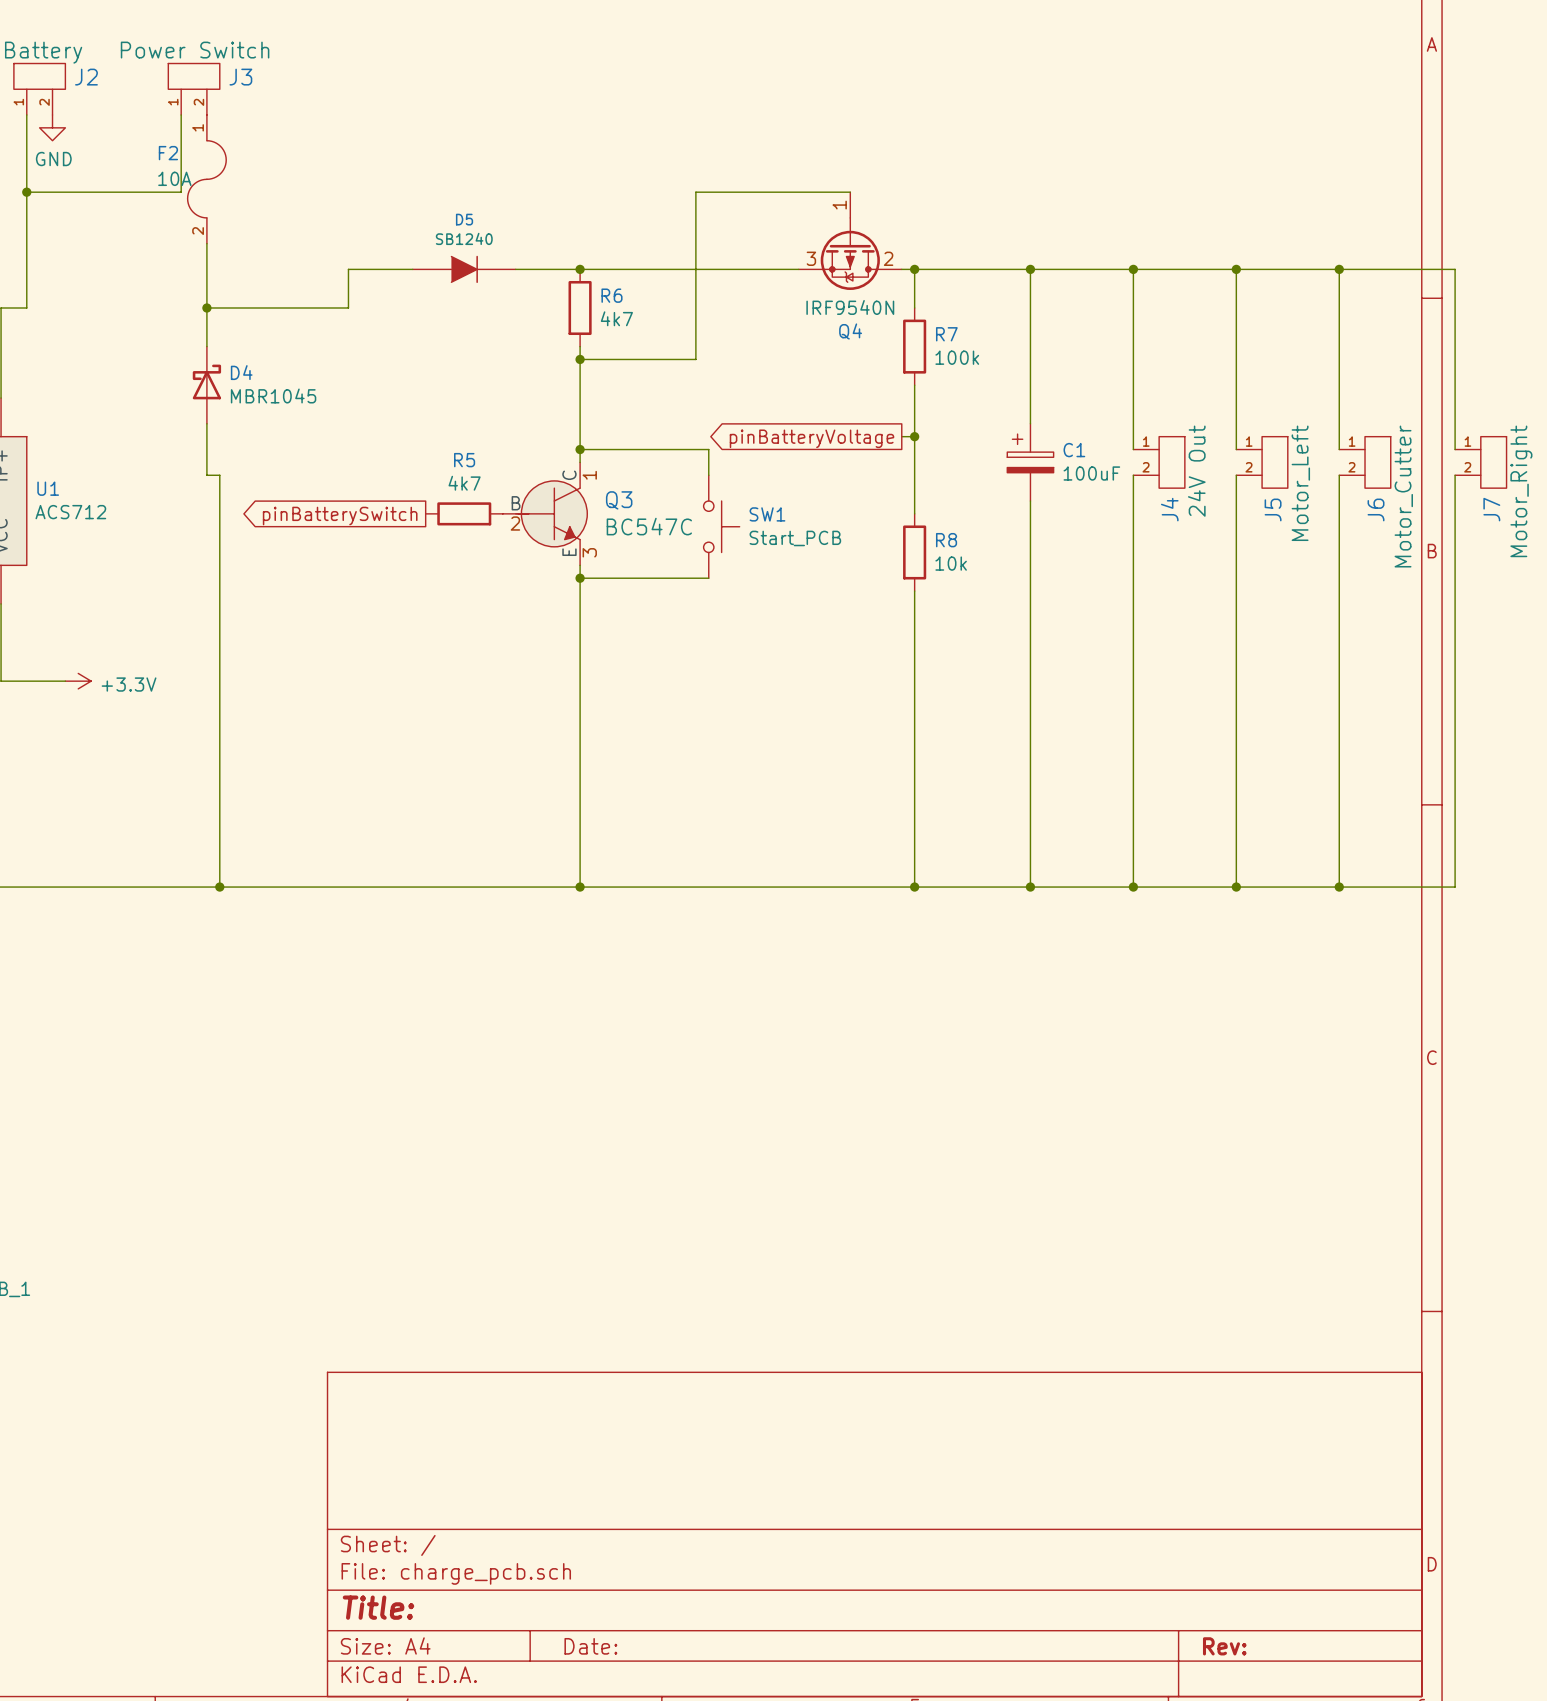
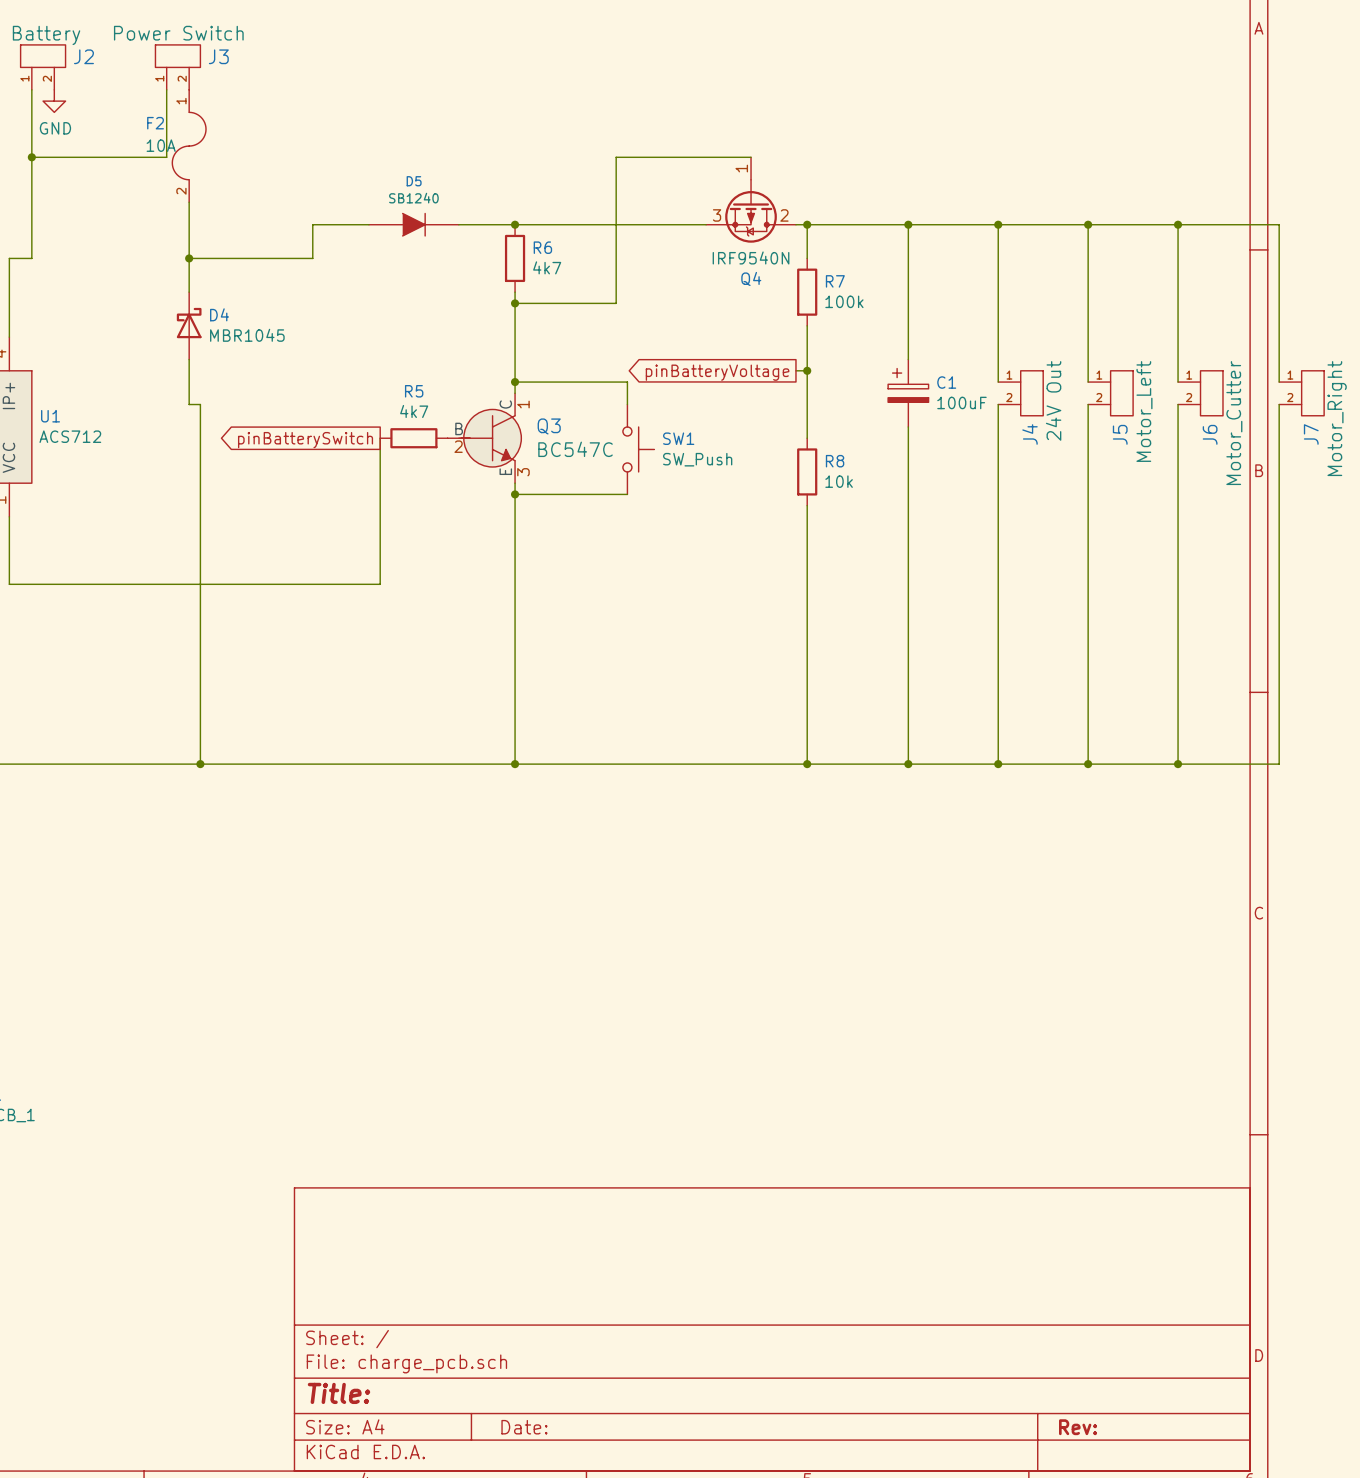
wire: none -> (380, 438) (380, 584) (65, 584)
SW1 value: Start_PCB (795, 538) -> SW_Push (697, 459)
power symbol: +3.3V (78, 681) -> none

